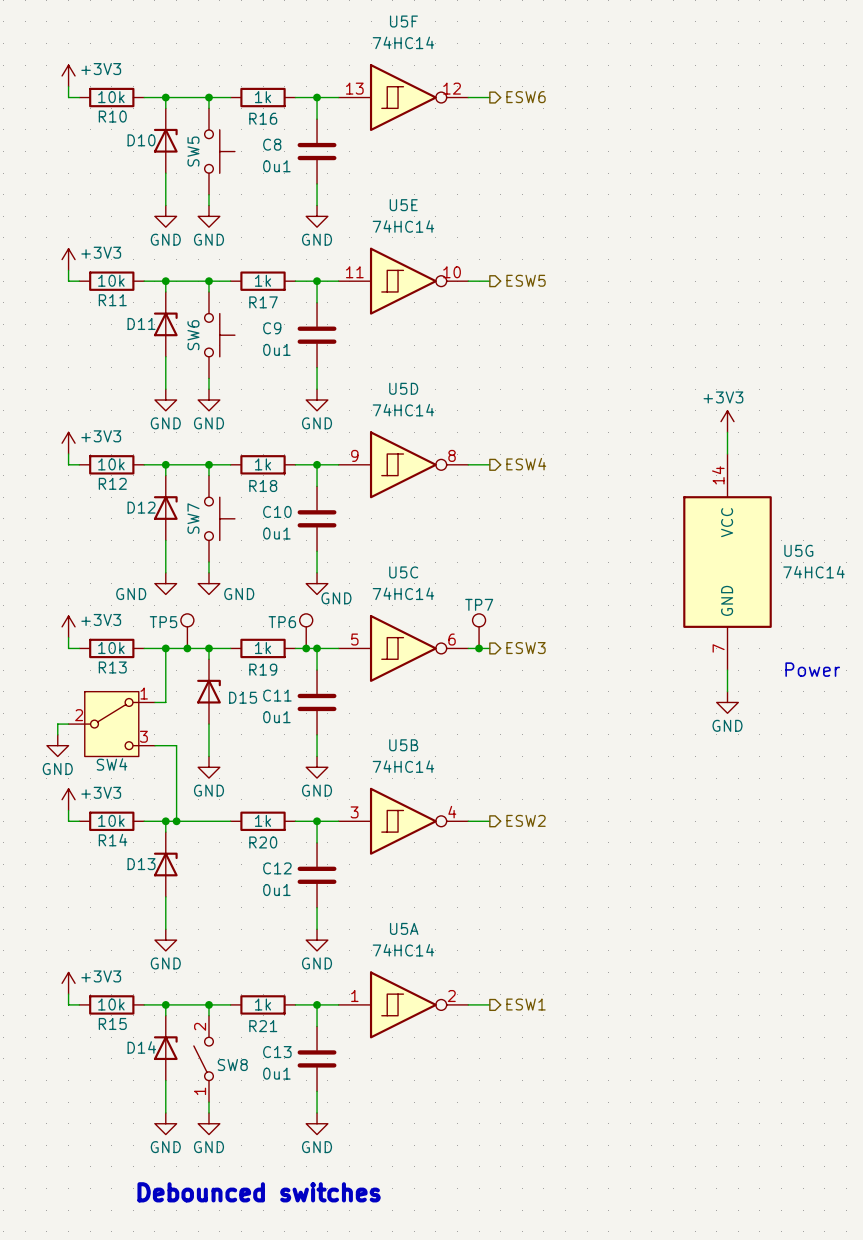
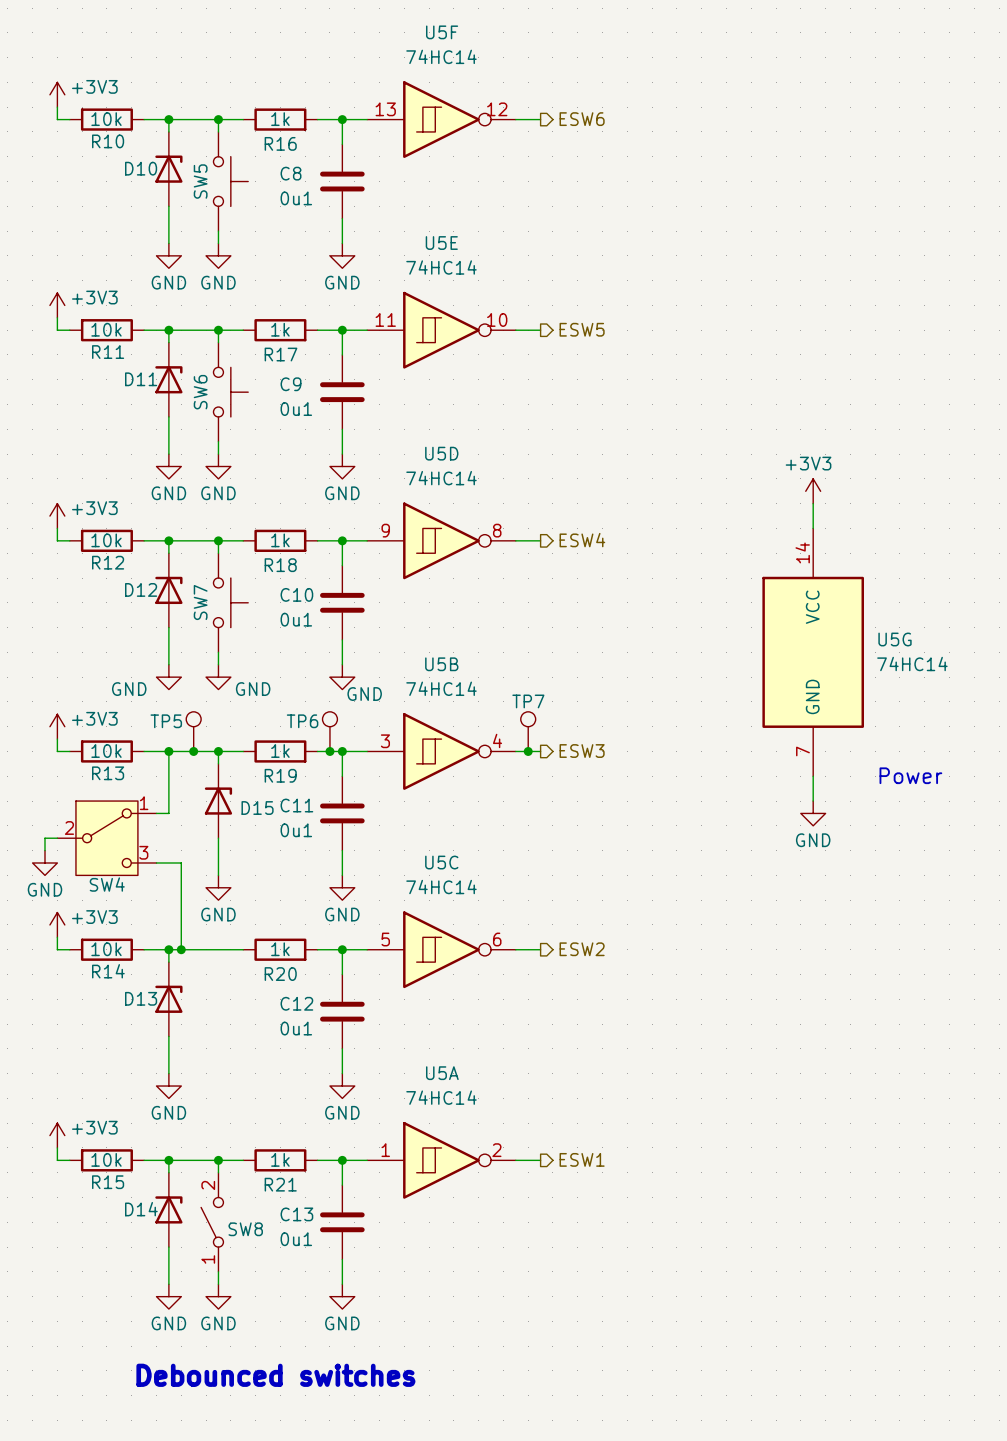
U5C position: (403, 648) -> (441, 949)
U5B position: (403, 821) -> (441, 751)

